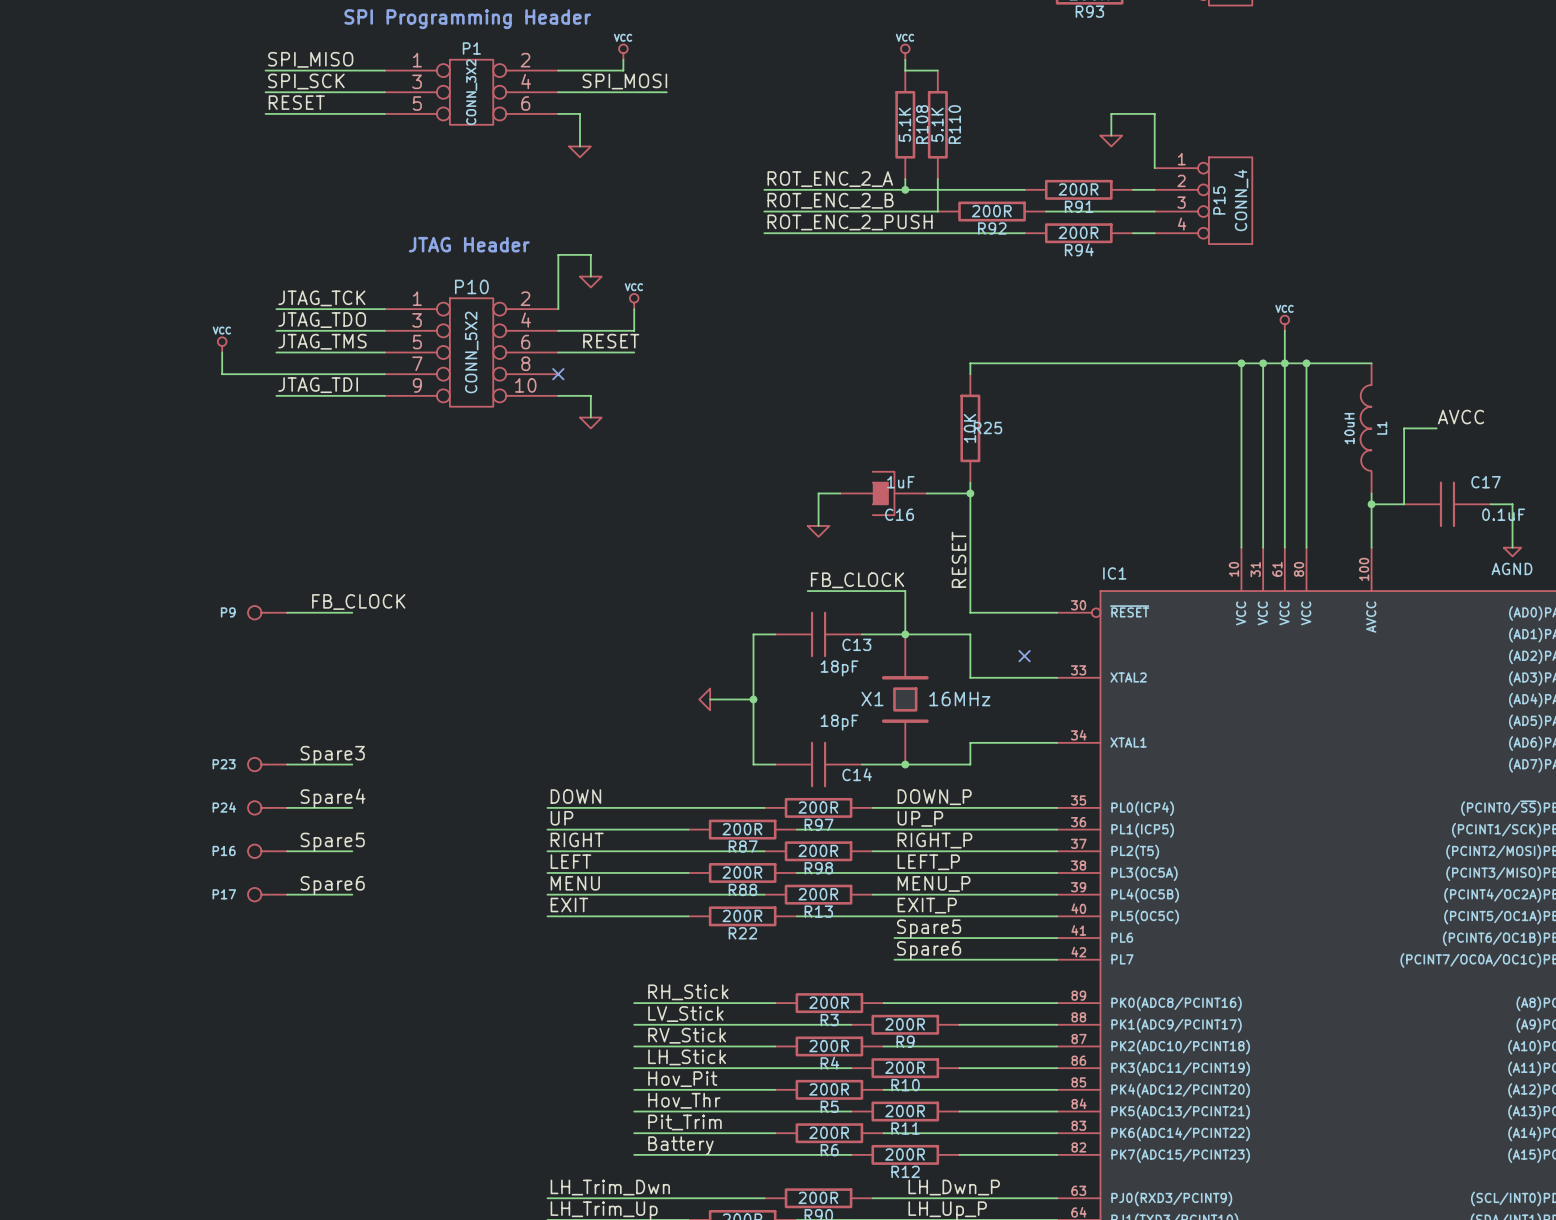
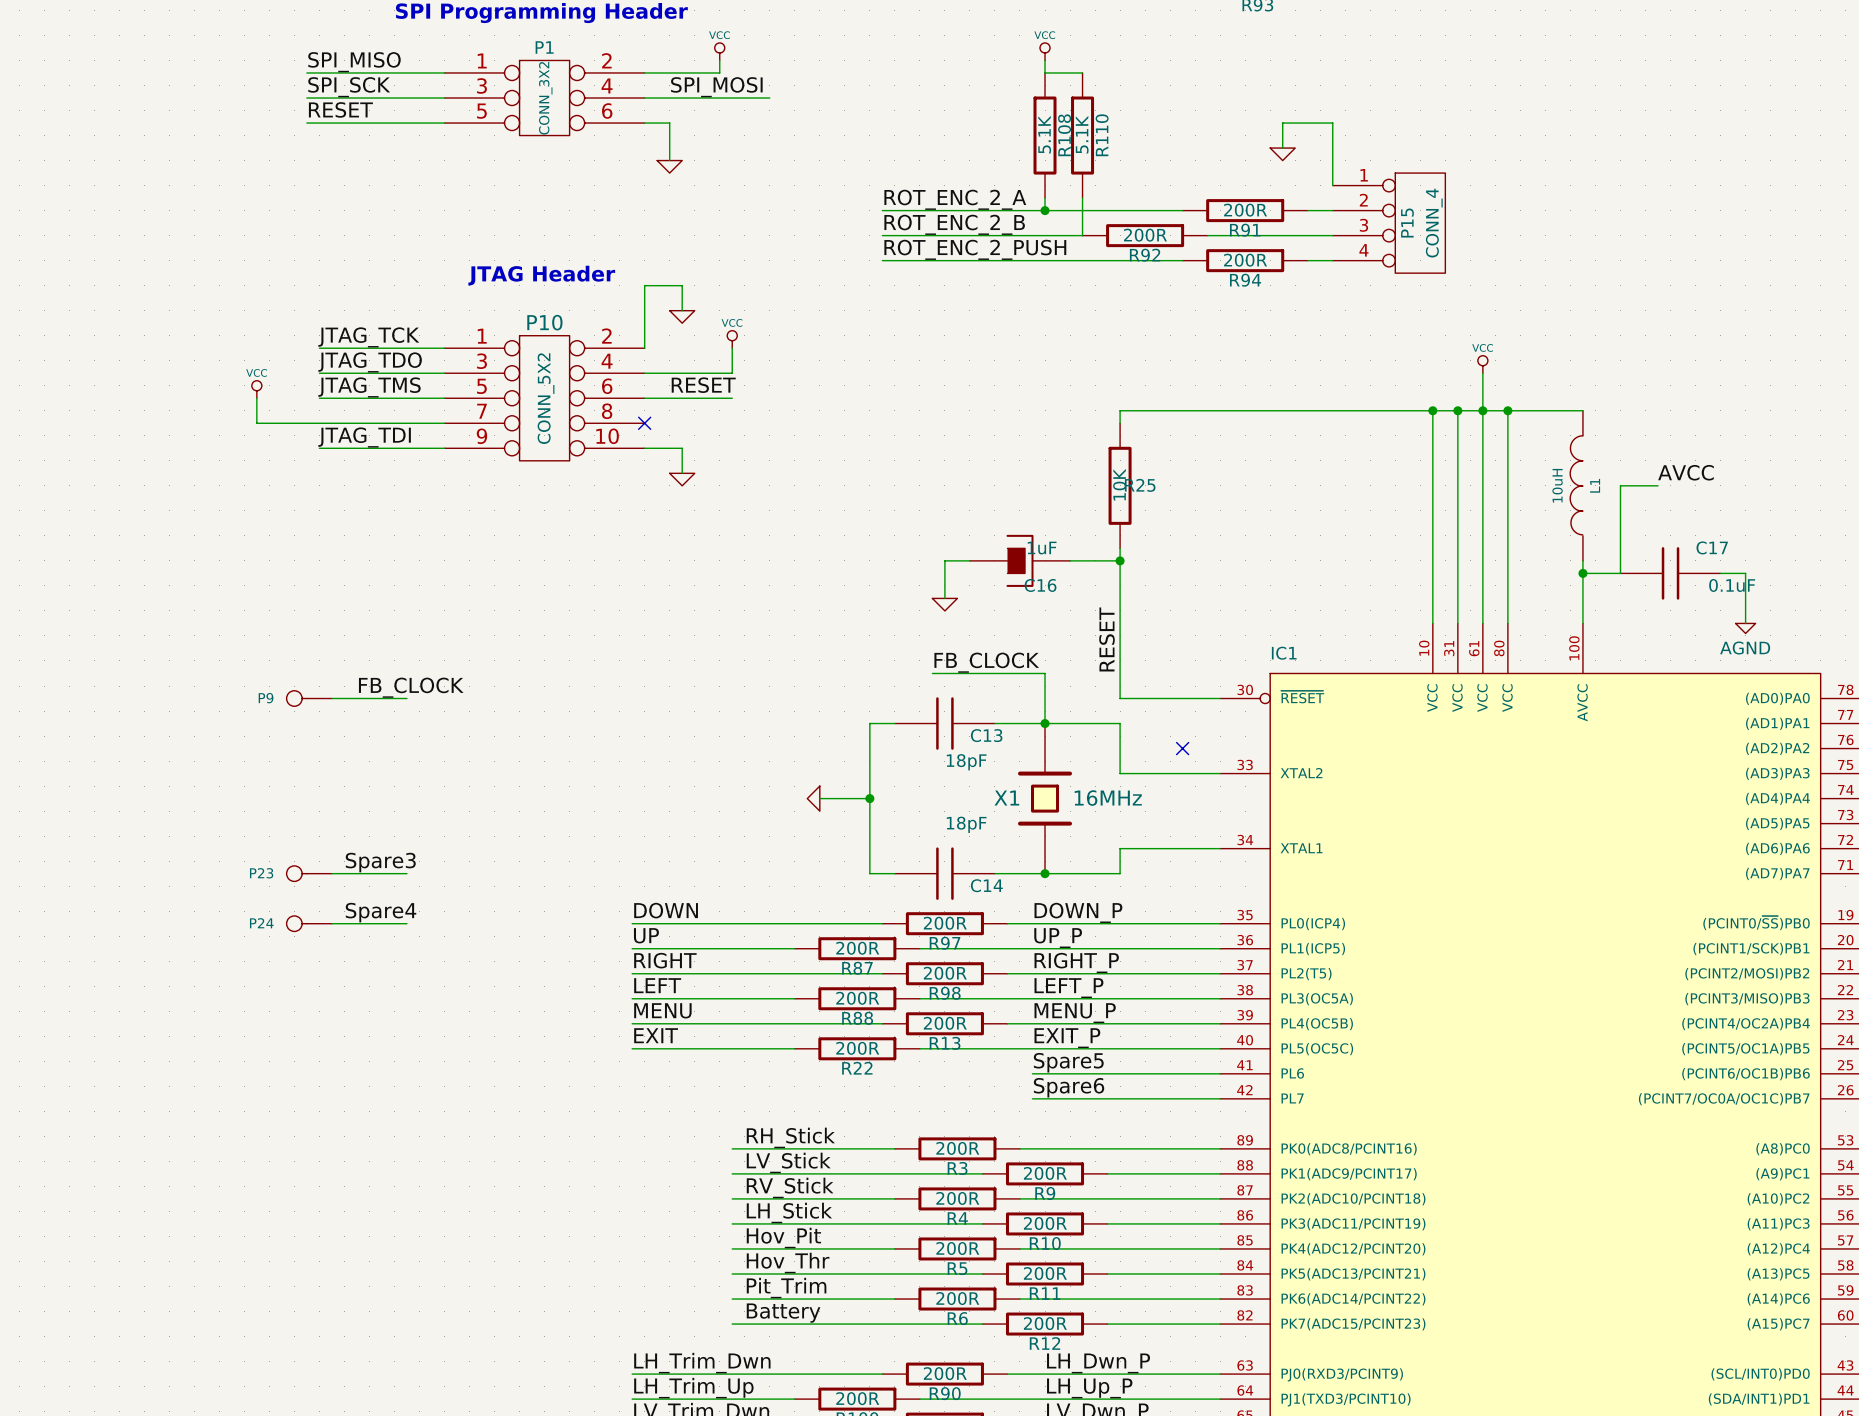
label: Spare5 (332, 842) -> none
P16: (267, 851) -> none
wire: (287, 851) (352, 851) -> none
label: Spare6 (332, 885) -> none
P17: (267, 894) -> none
wire: (287, 894) (352, 894) -> none

